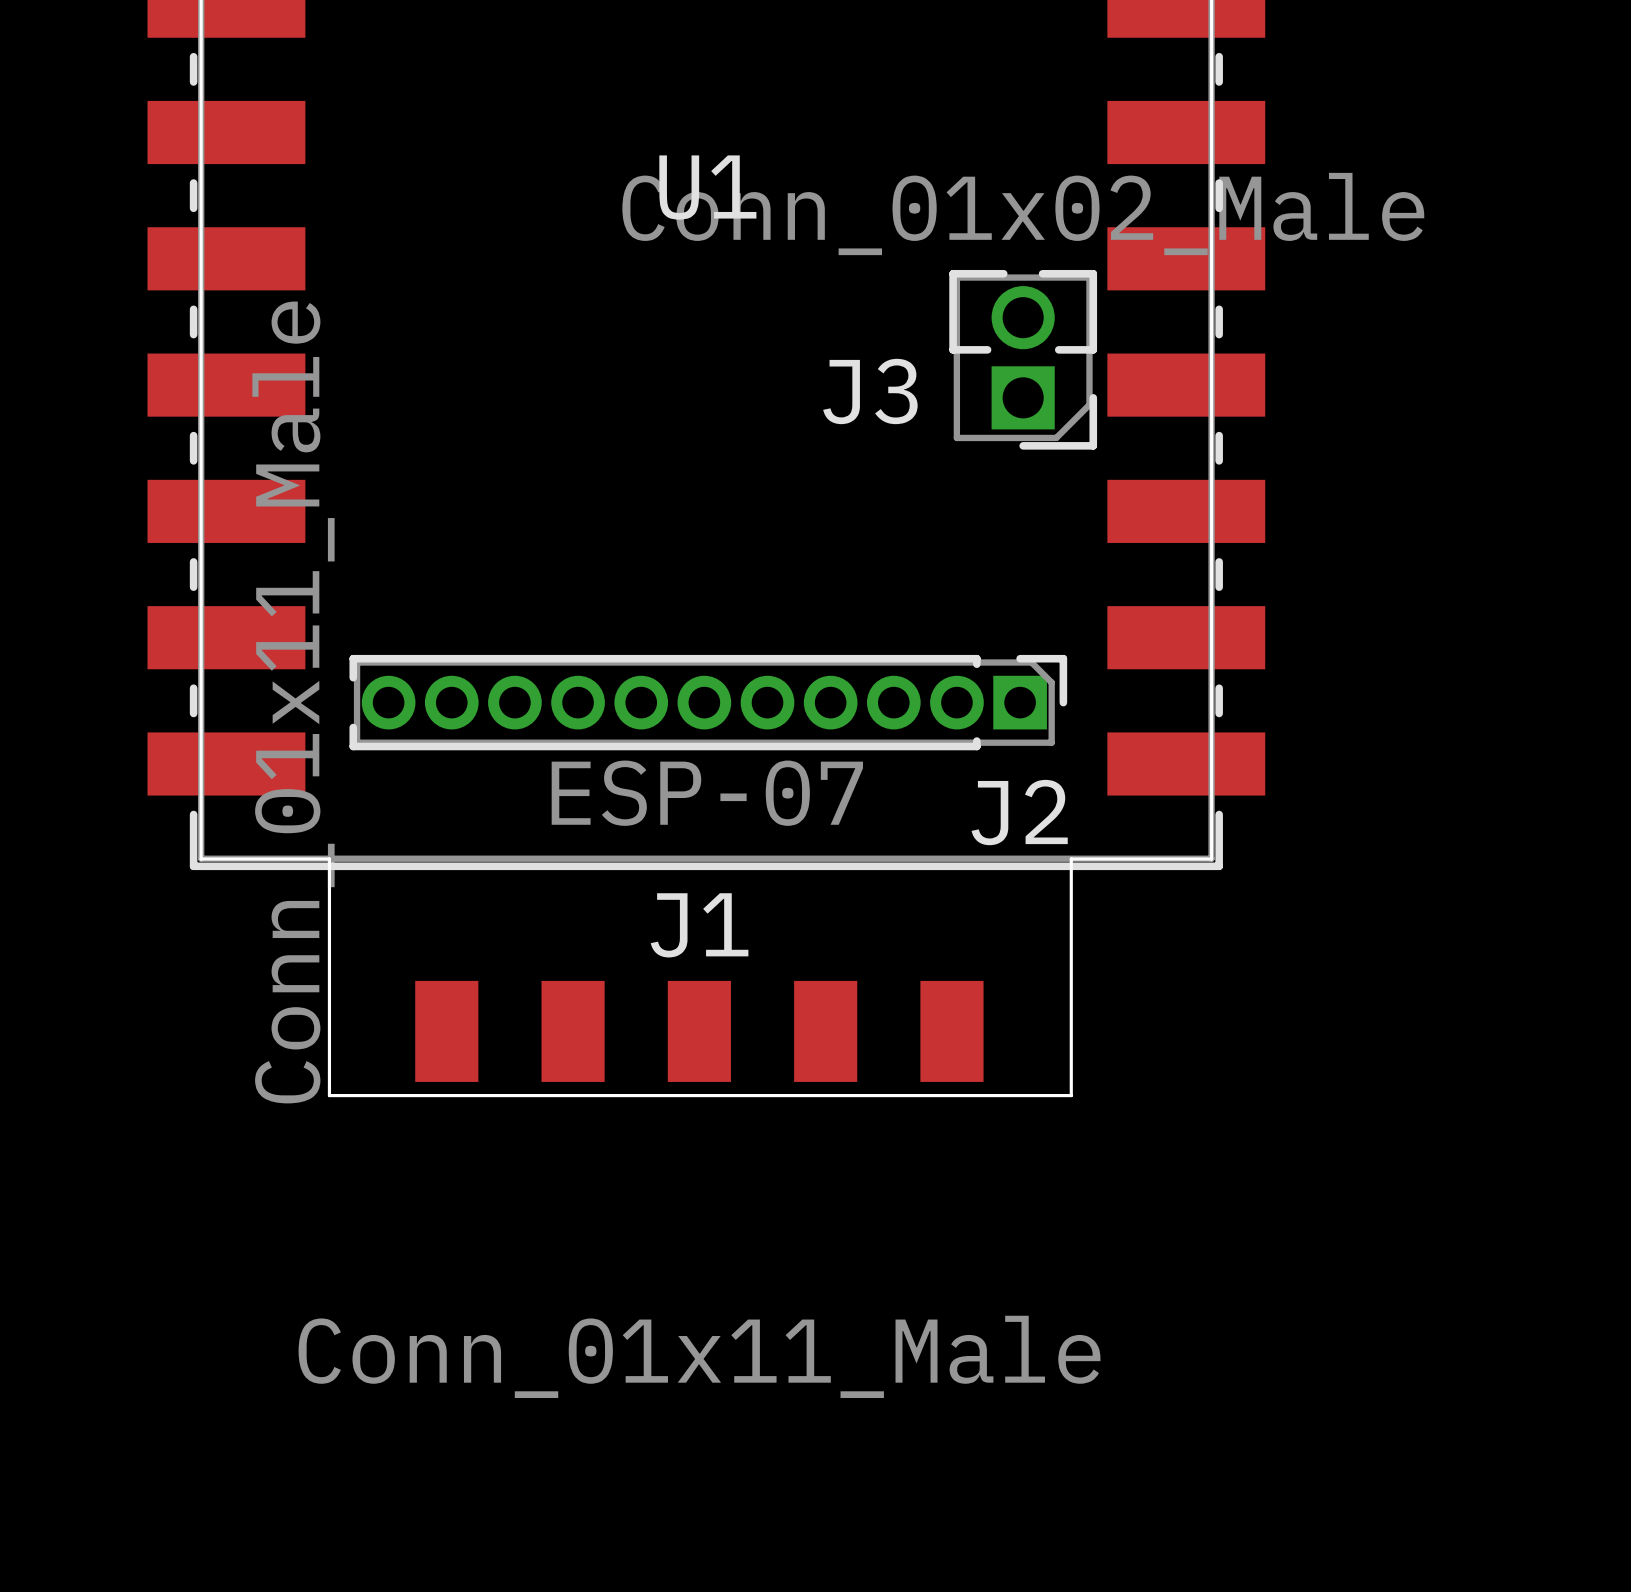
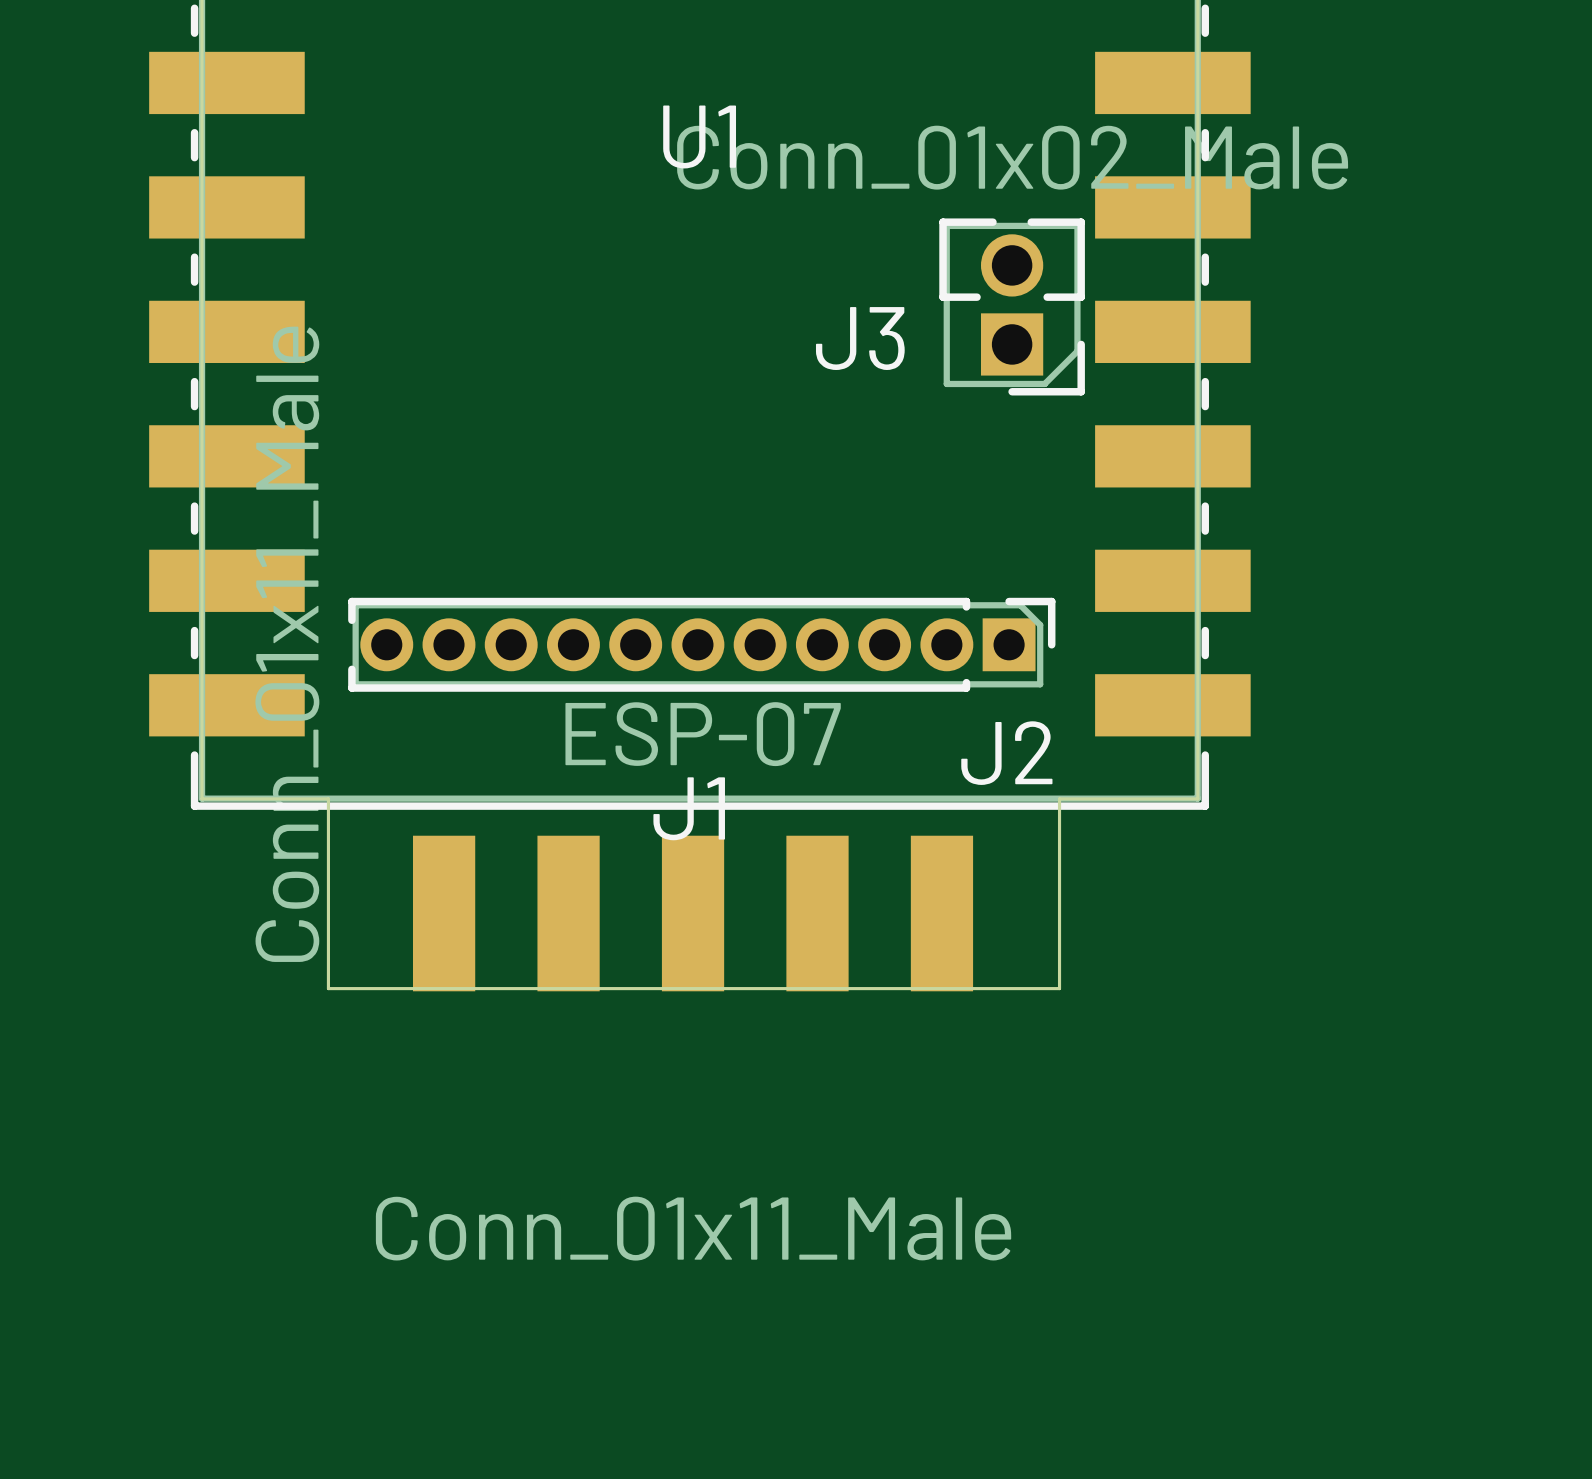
J1 footprint: [415, 980, 984, 1082] -> [412, 835, 974, 992]
board edge: (329, 1051) (329, 1095) (1071, 1095) (1071, 1051) -> (328, 988) (1059, 988)

